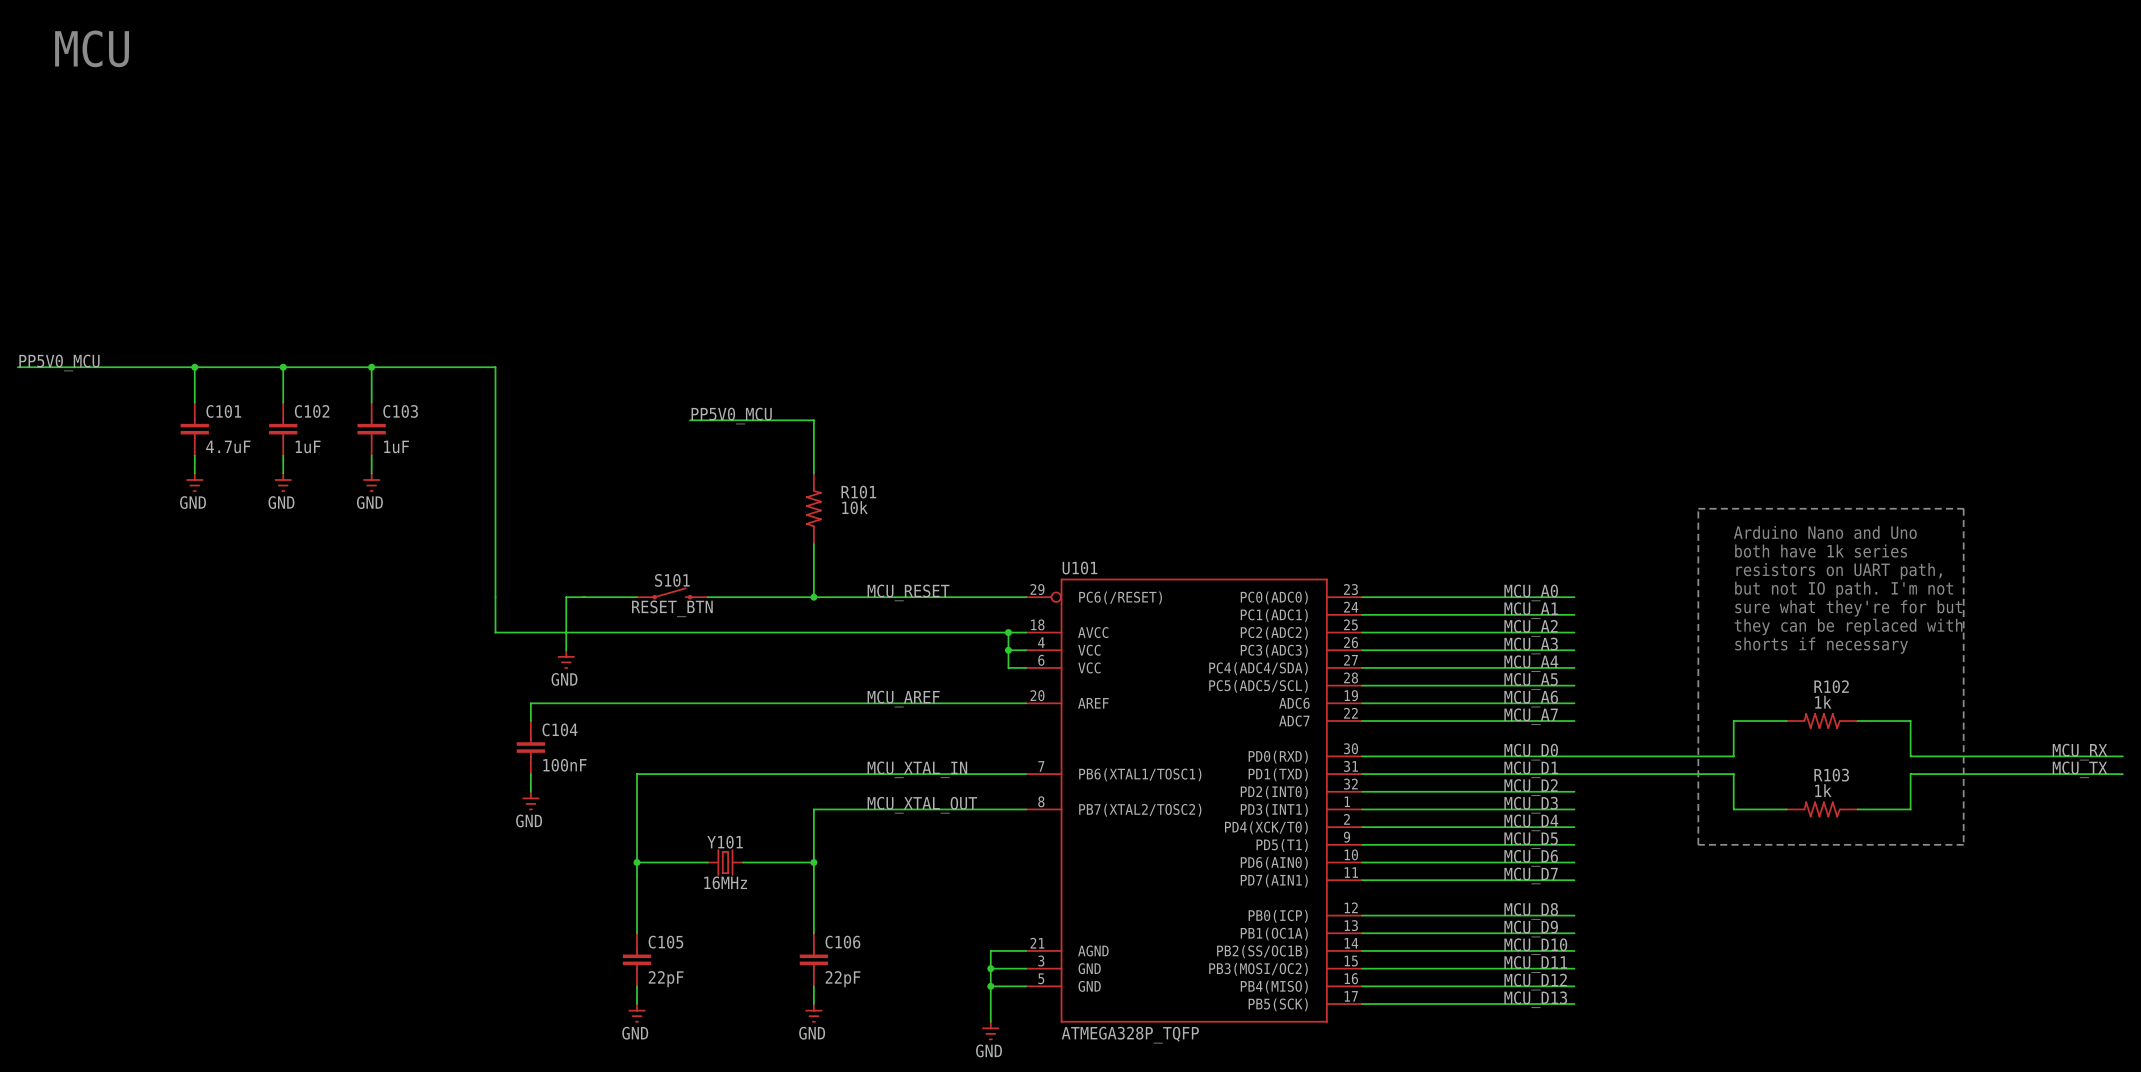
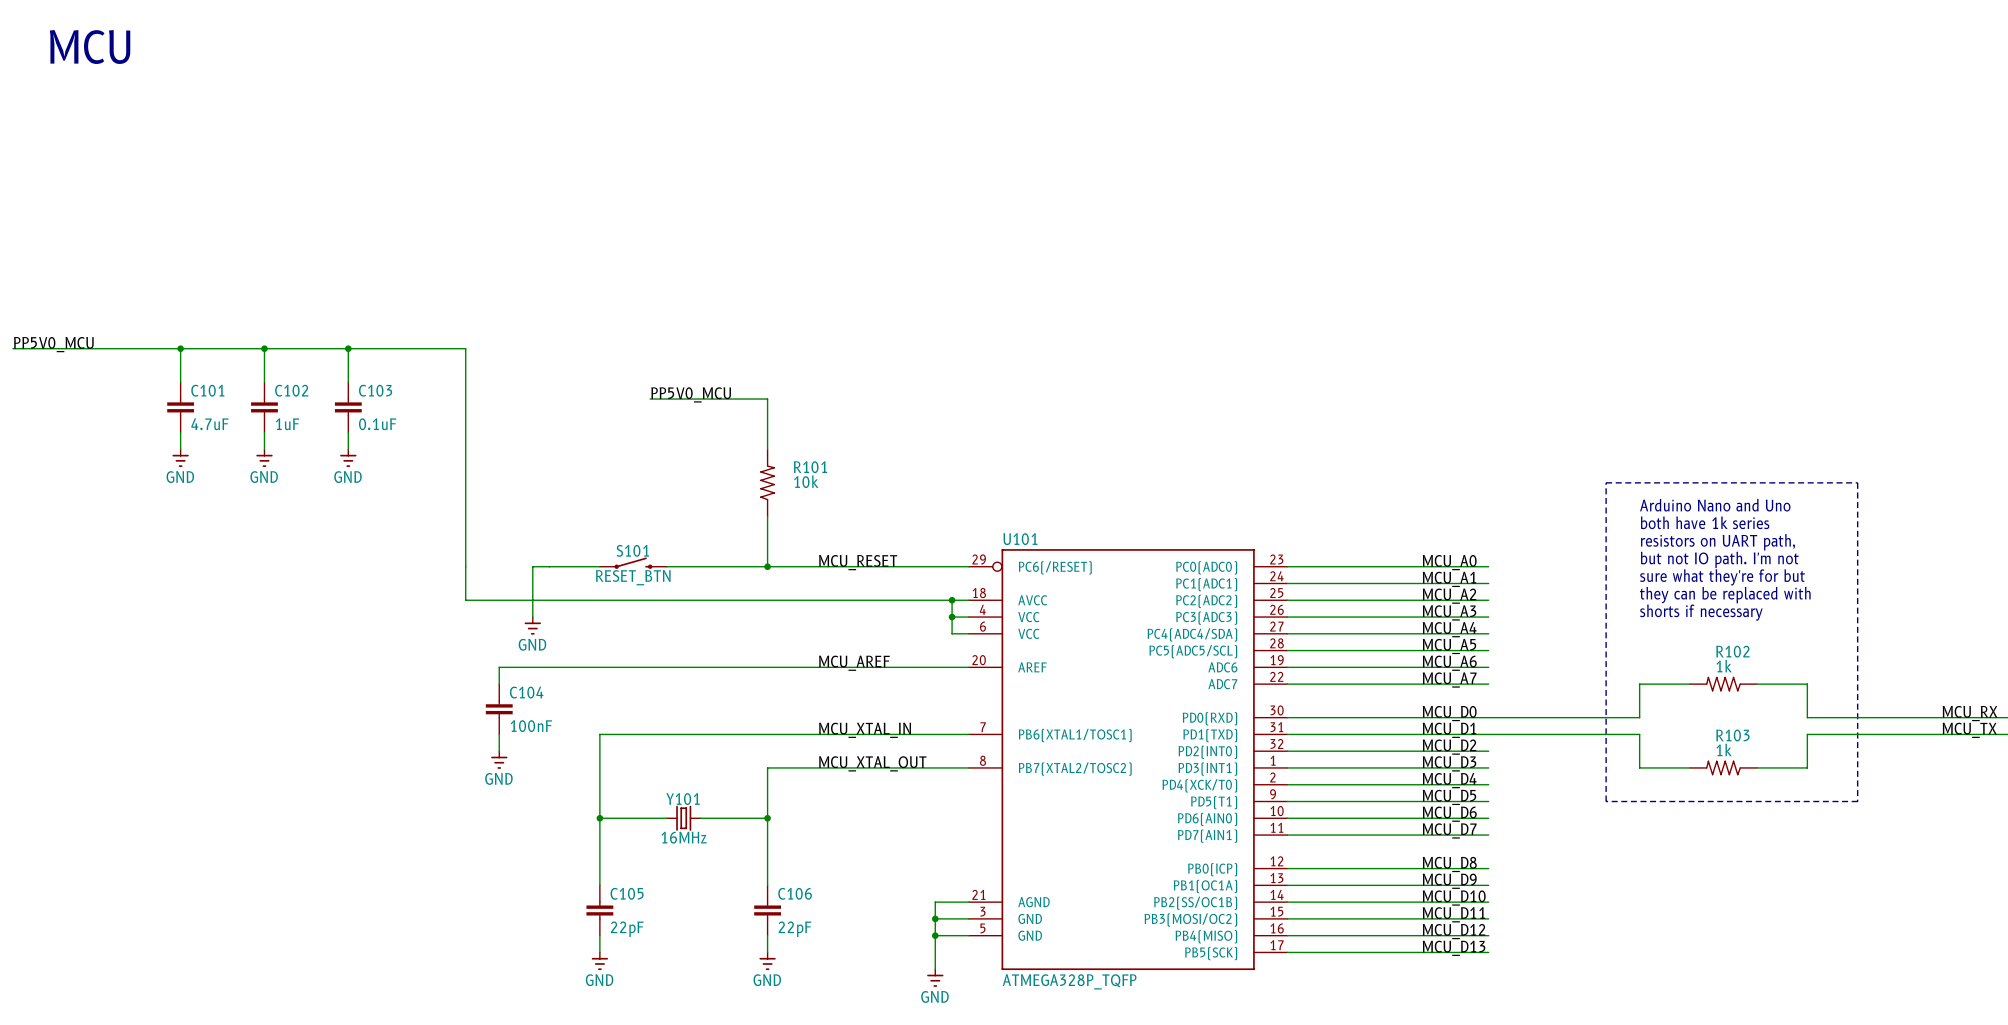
C103 value: 1uF (396, 446) -> 0.1uF (377, 424)

